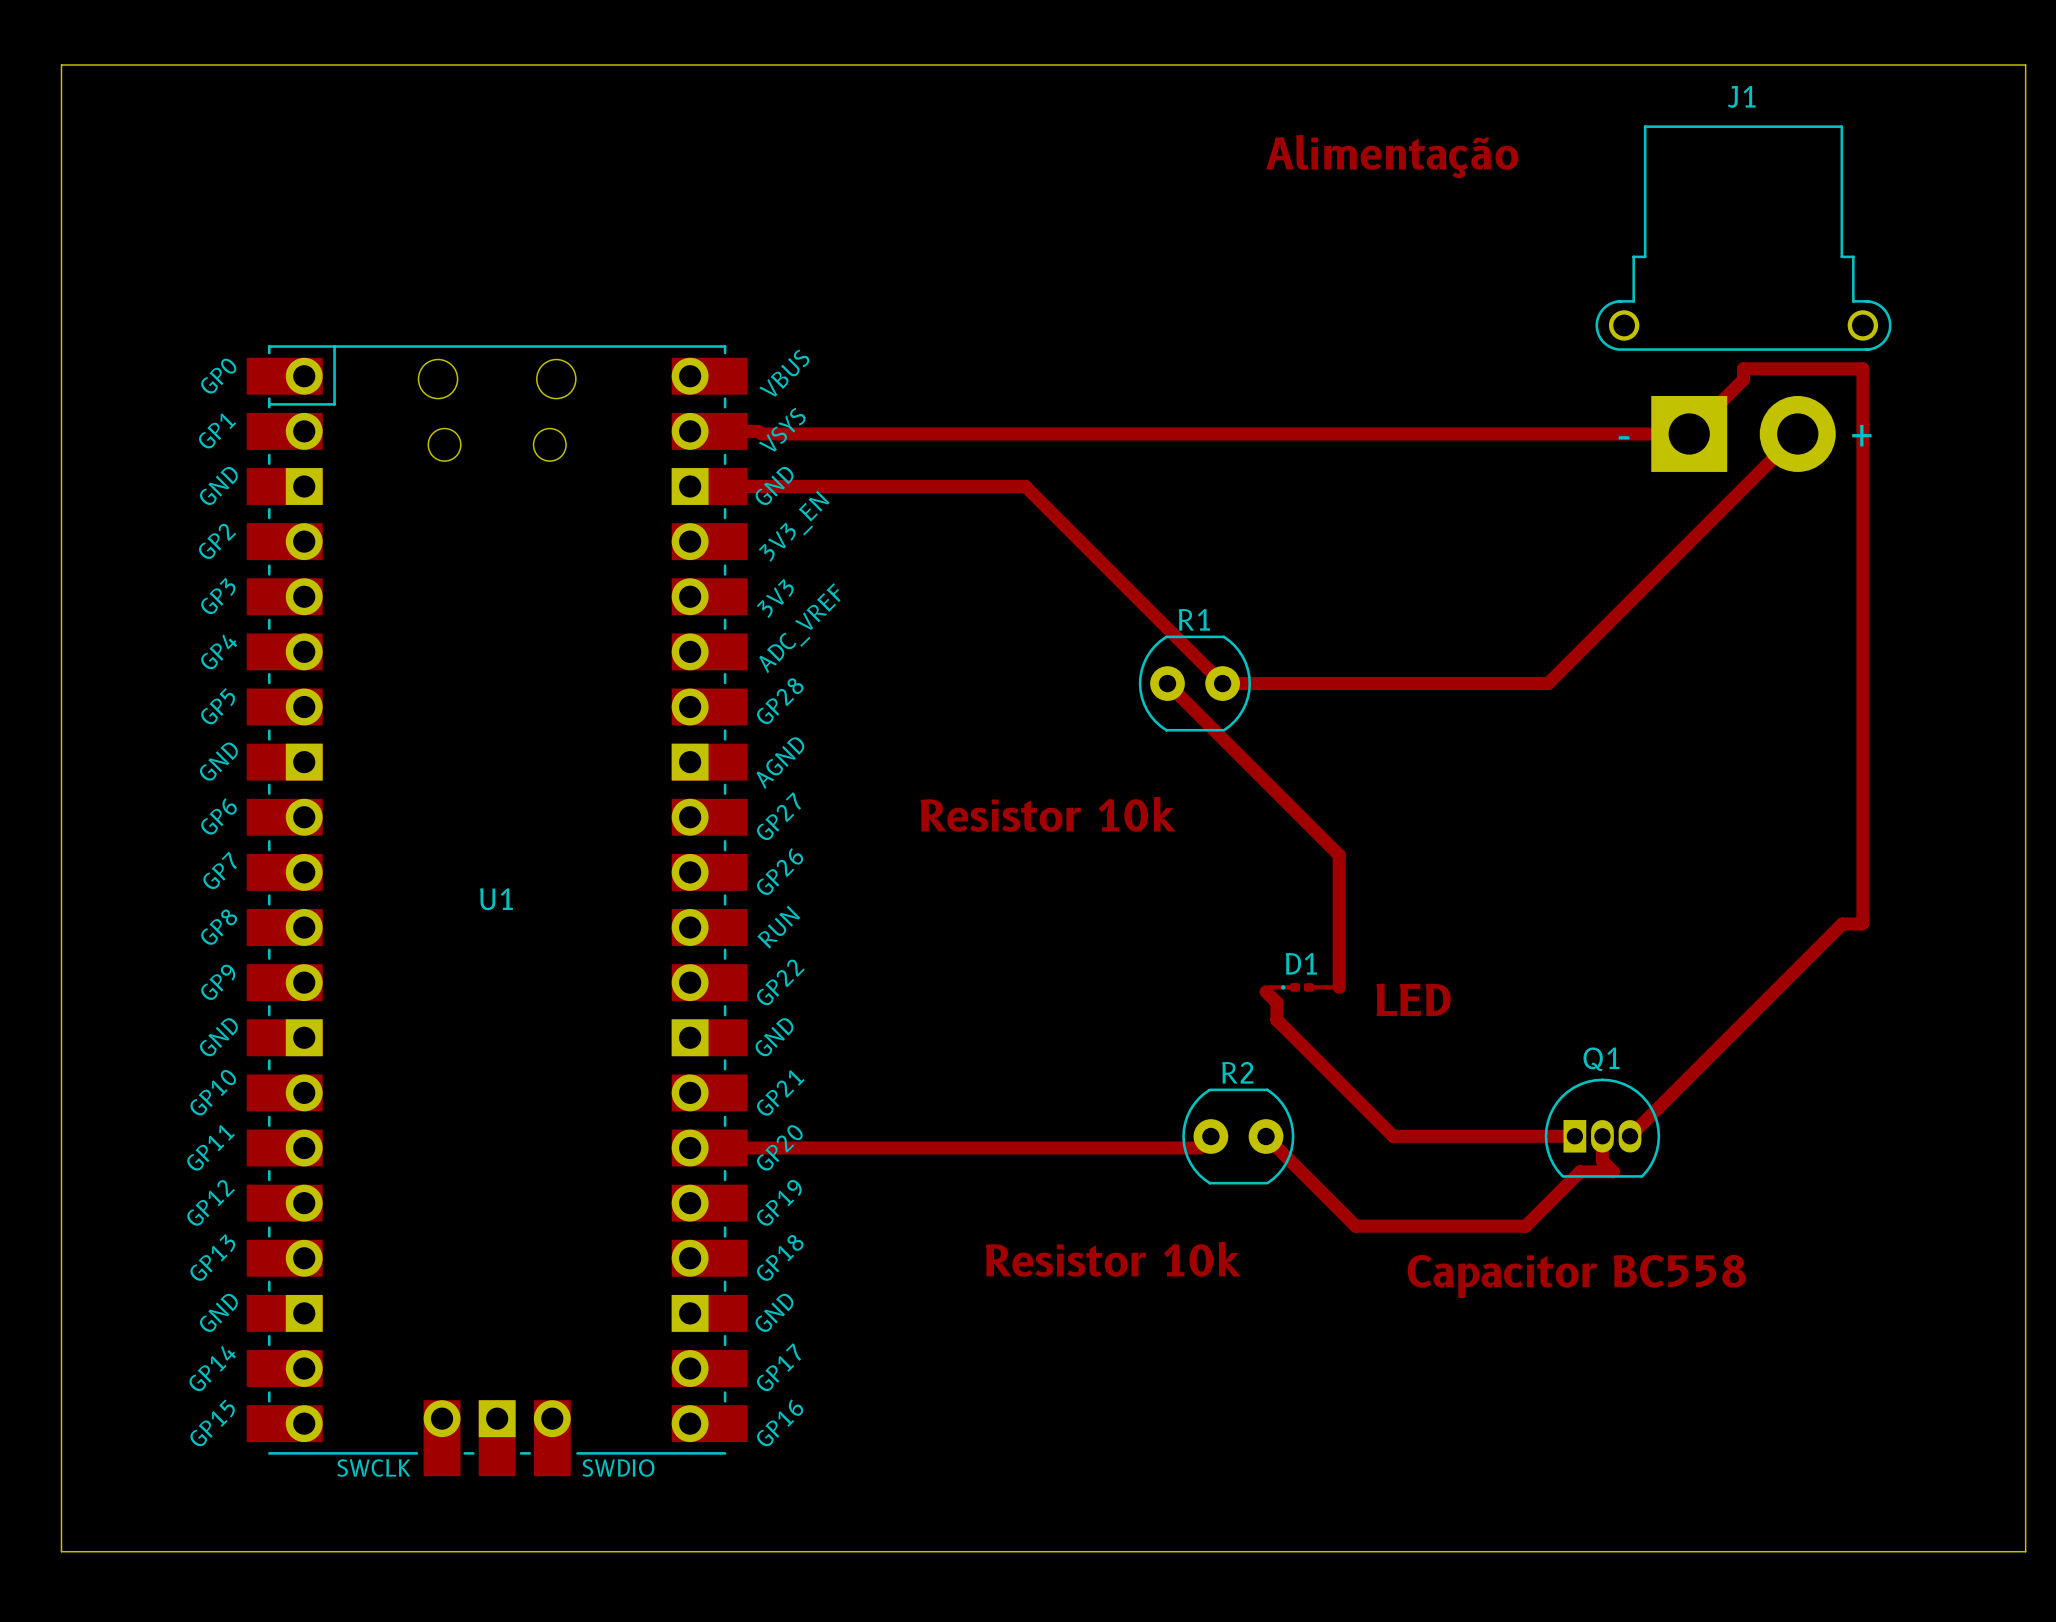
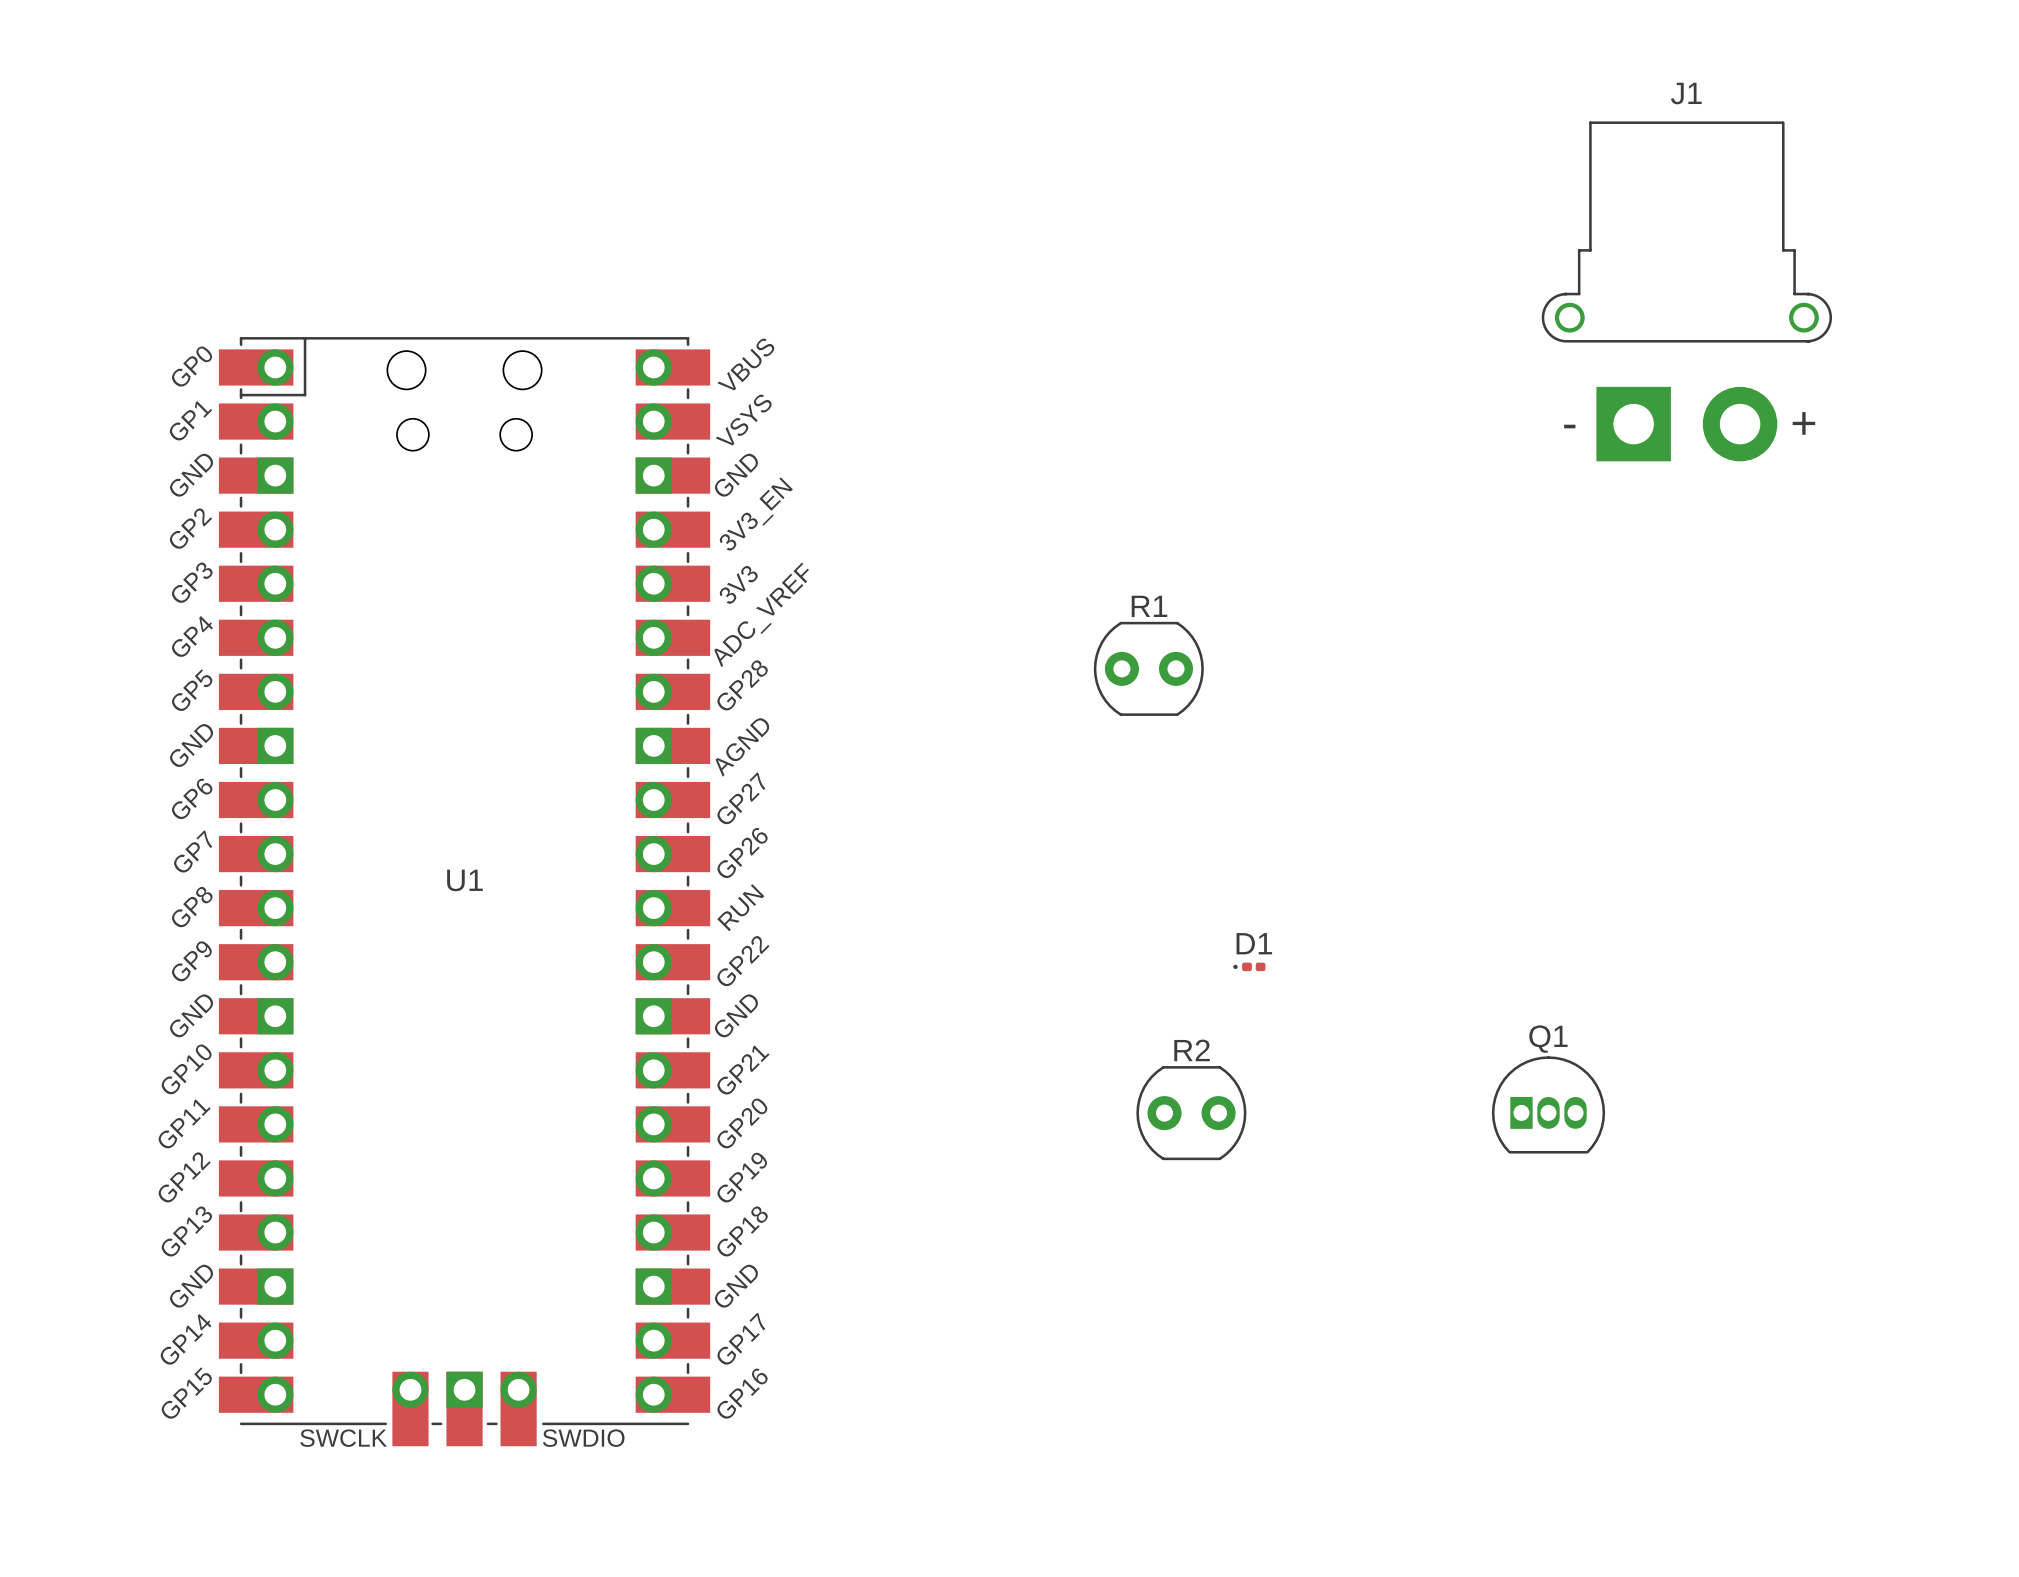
board edge: (61, 65) (2025, 65) (2025, 1551) (61, 1551) (61, 65) -> none
text: Alimentação (1392, 156) -> none
track: (690, 431) (758, 431) (761, 433) (1689, 433) (1743, 379) (1743, 368) (1862, 368) (1862, 922) (1842, 924) (1629, 1136) -> none
track: (1797, 433) (1548, 683) (1222, 683) (1025, 486) (690, 486) -> none
track: (1167, 683) (1339, 855) (1339, 987) (1308, 987) -> none
text: Resistor 10k (1048, 814) -> none
track: (1295, 987) (1270, 987) (1266, 991) (1276, 1002) (1276, 1019) (1393, 1136) (1574, 1136) -> none
text: LED (1413, 999) -> none
track: (1210, 1136) (1199, 1148) (690, 1148) -> none
track: (1602, 1136) (1602, 1161) (1613, 1171) (1579, 1171) (1525, 1226) (1355, 1226) (1266, 1136) -> none
text: Resistor 10k (1113, 1259) -> none
text: Capacitor BC558 (1576, 1276) -> none

